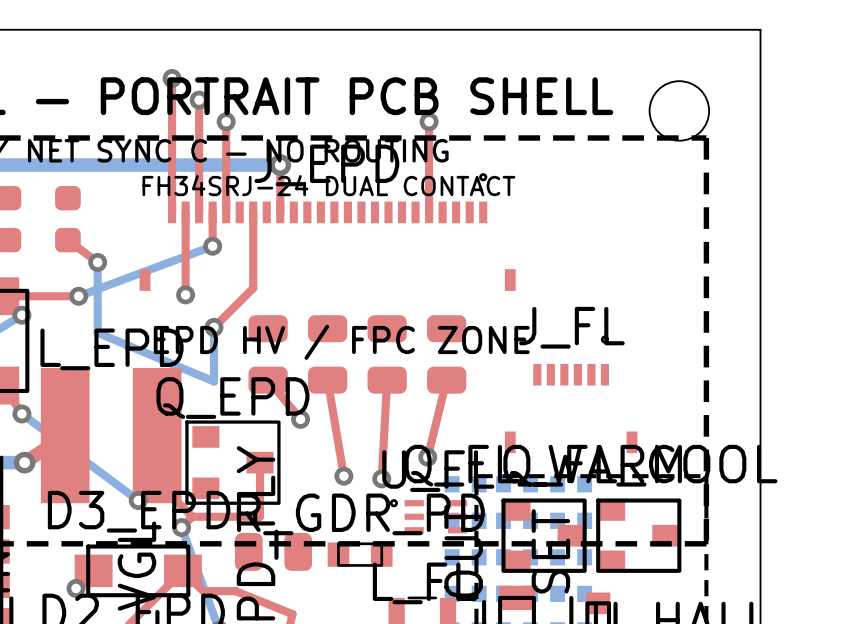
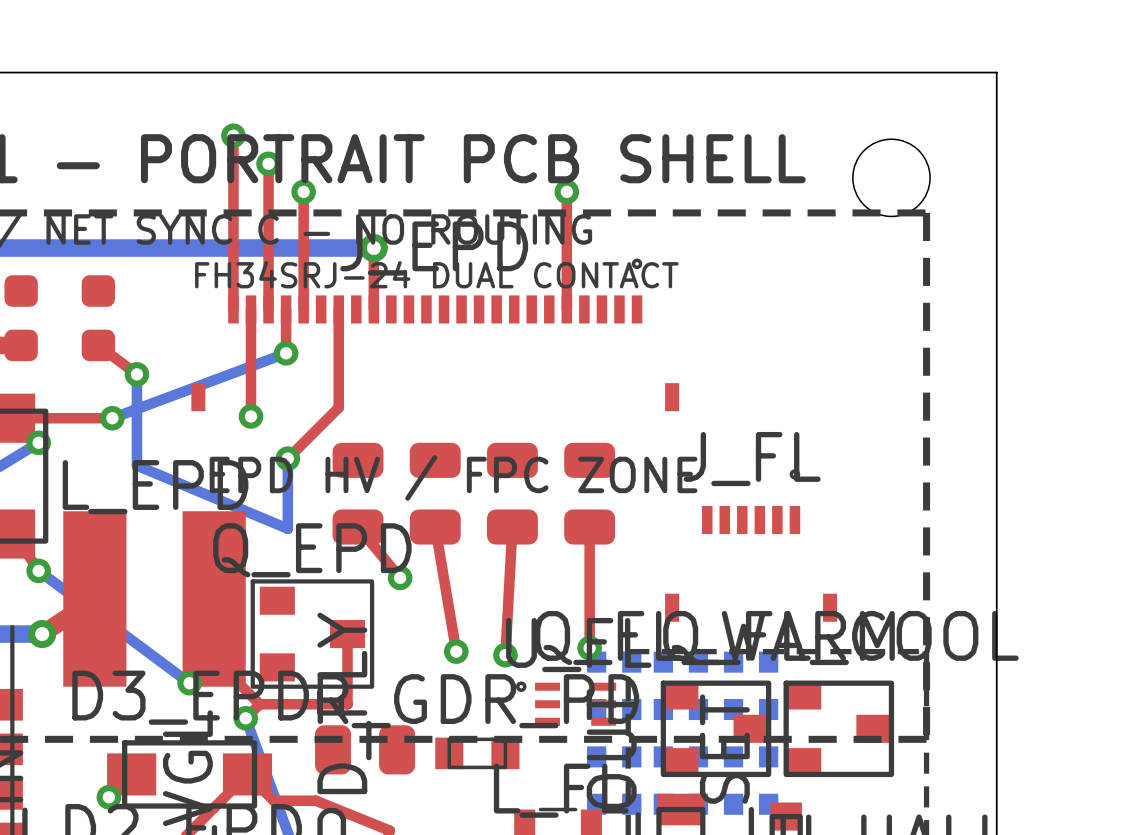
top track: (446, 380) (427, 457) -> (589, 527) (589, 648)
via position: (427, 457) -> (589, 648)

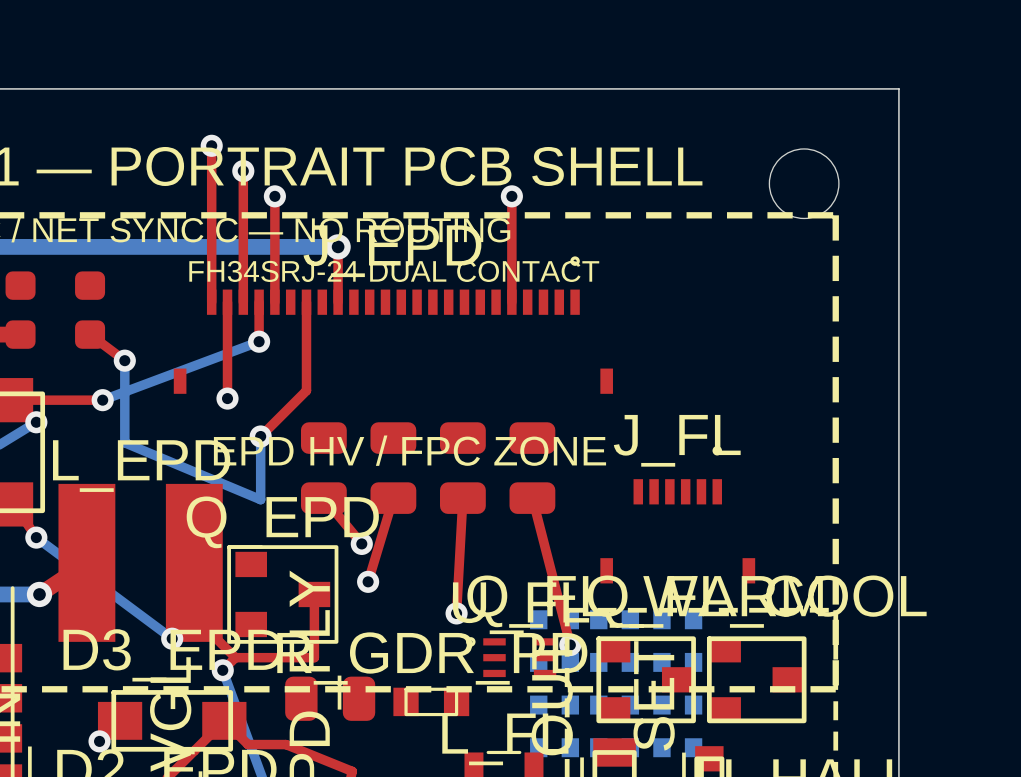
top track: (435, 527) (456, 651) -> (393, 498) (368, 581)
top track: (589, 527) (589, 648) -> (532, 498) (570, 645)
via position: (589, 648) -> (570, 645)
via position: (456, 651) -> (368, 581)

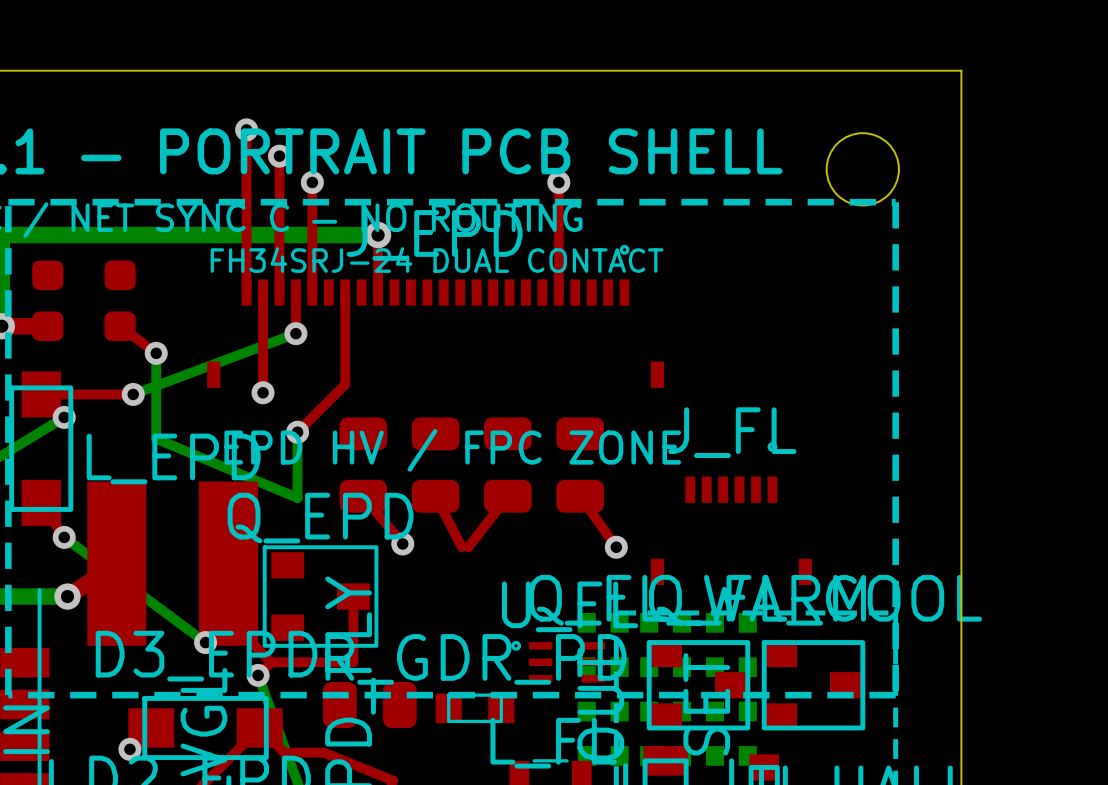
top track: (393, 498) (368, 581) -> (435, 496) (461, 547)
top track: (462, 498) (456, 613) -> (507, 496) (468, 547)
top track: (532, 498) (570, 645) -> (580, 496) (616, 547)
via: none -> (616, 547)
via: (368, 581) -> none
via: (456, 613) -> none
via: (570, 645) -> none

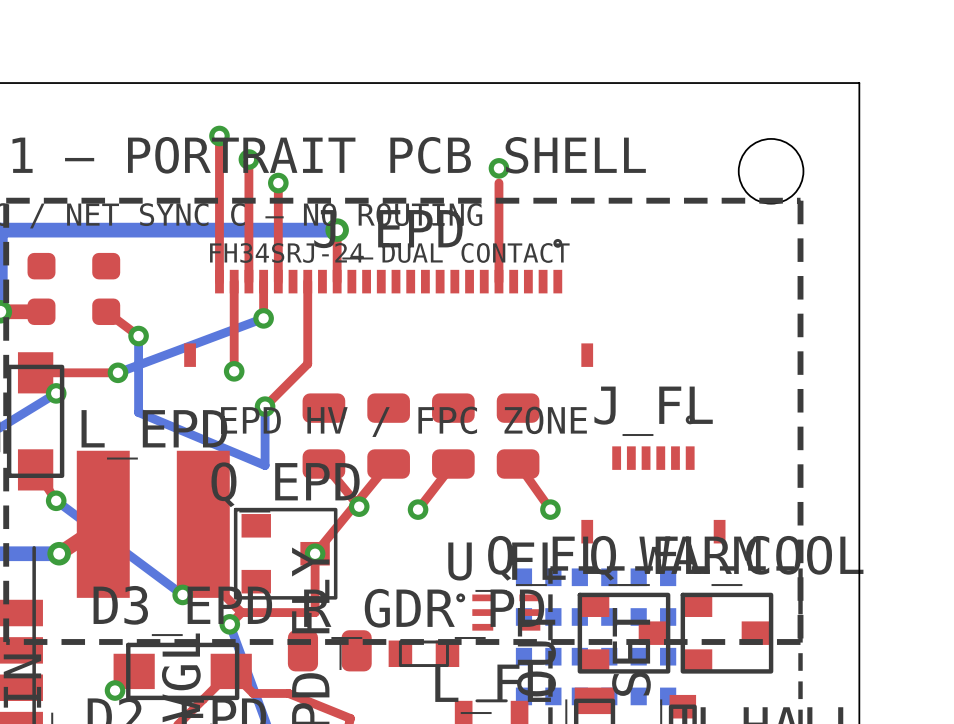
via position: (558, 182) -> (498, 168)
top track: (435, 496) (461, 547) -> (388, 464) (315, 553)
via: none -> (418, 509)
via: none -> (315, 553)

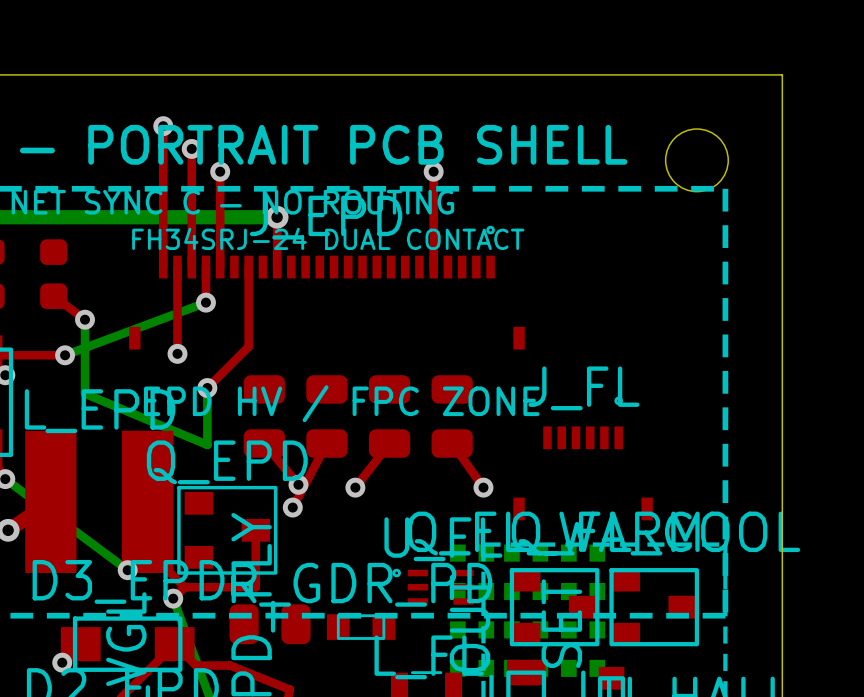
via position: (498, 168) -> (433, 171)
top track: (388, 464) (315, 553) -> (326, 443) (292, 507)
via position: (315, 553) -> (292, 507)

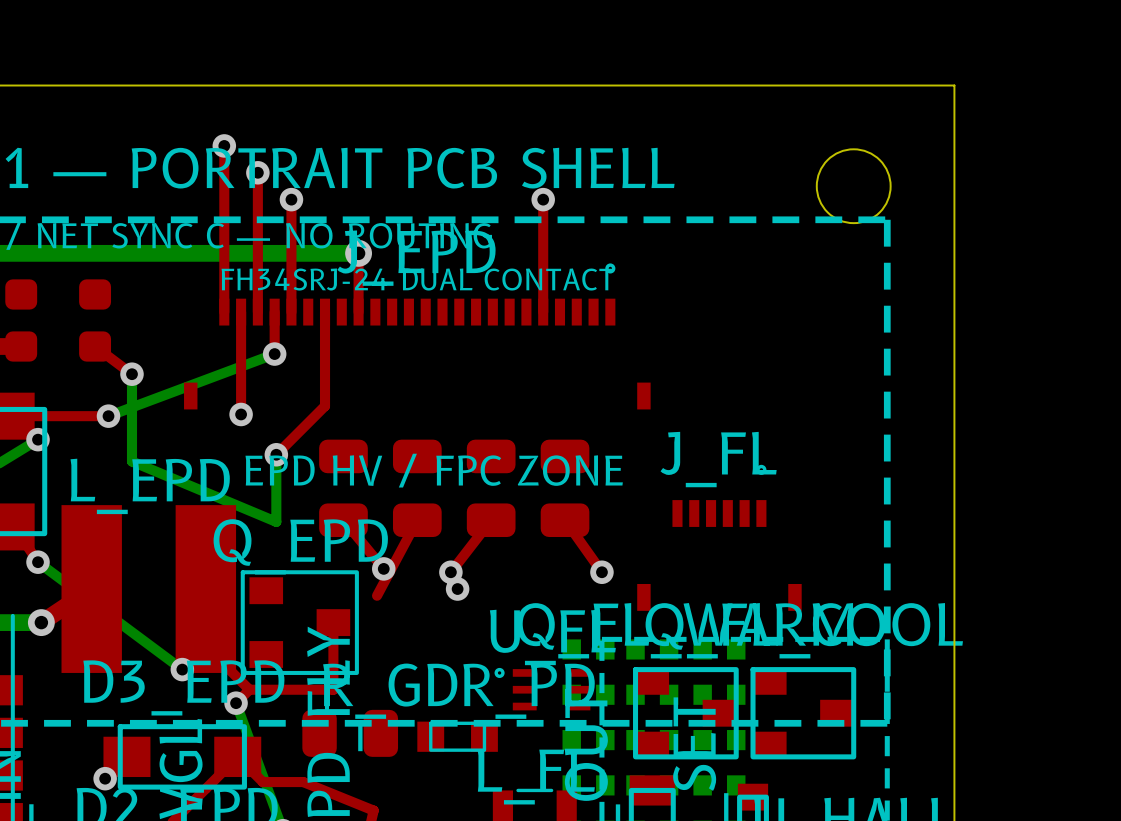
via position: (292, 507) -> (457, 589)

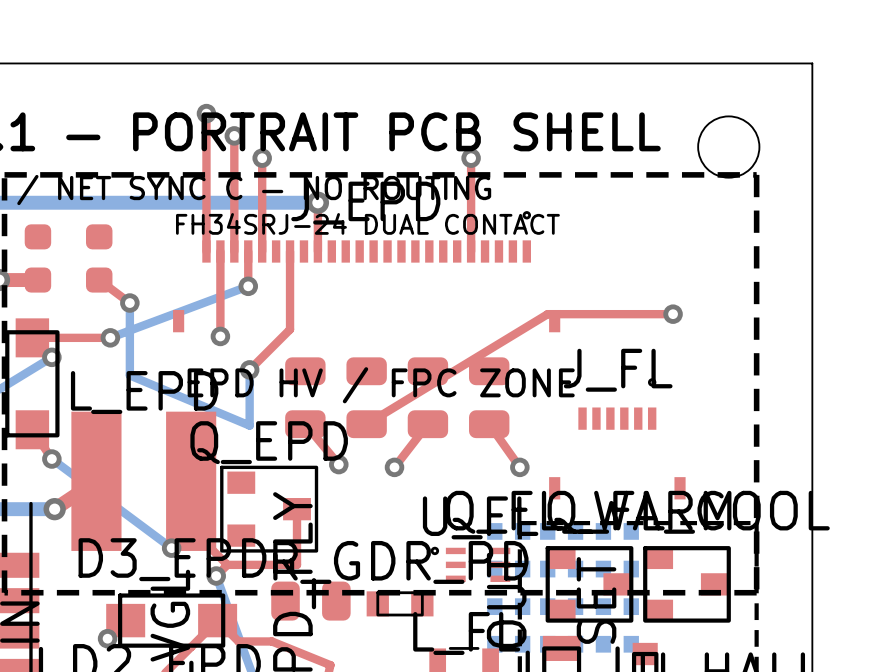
via: none -> (673, 314)
top track: (417, 520) (377, 595) -> (366, 424) (547, 314) (673, 314)
via: (457, 589) -> none

